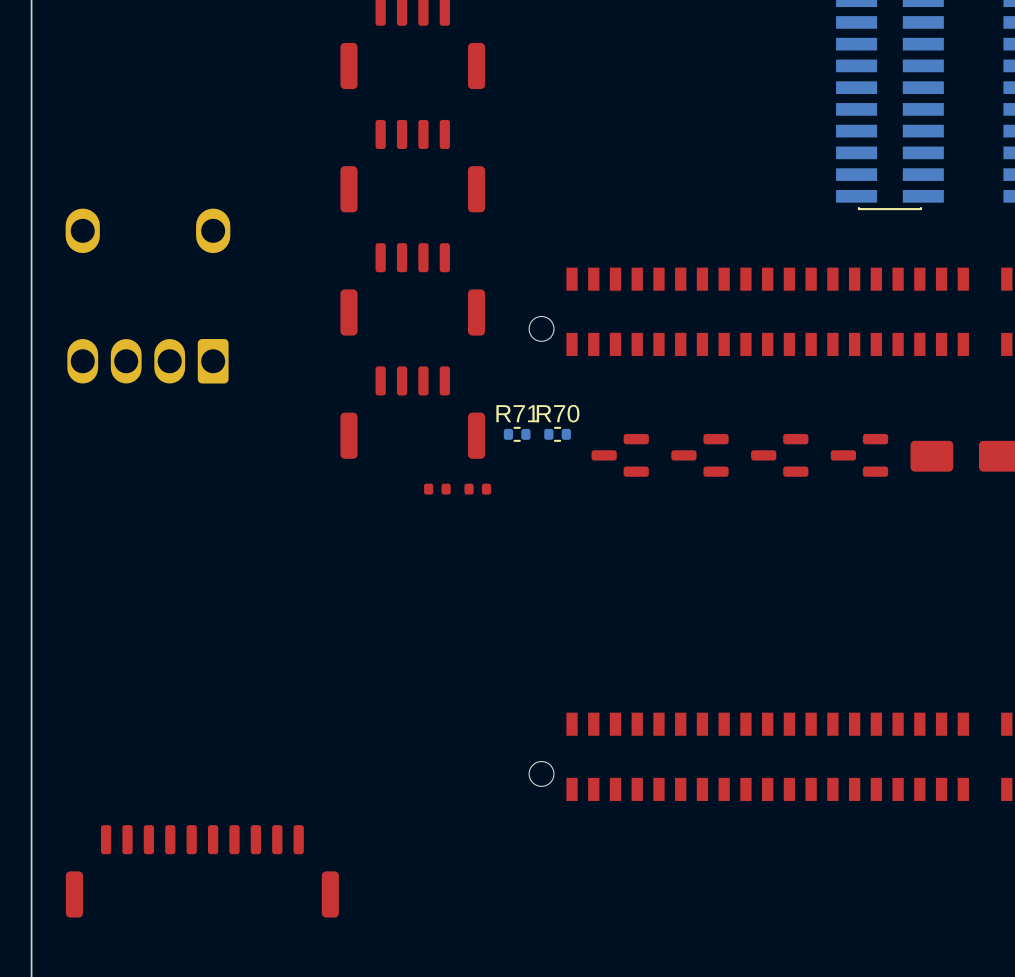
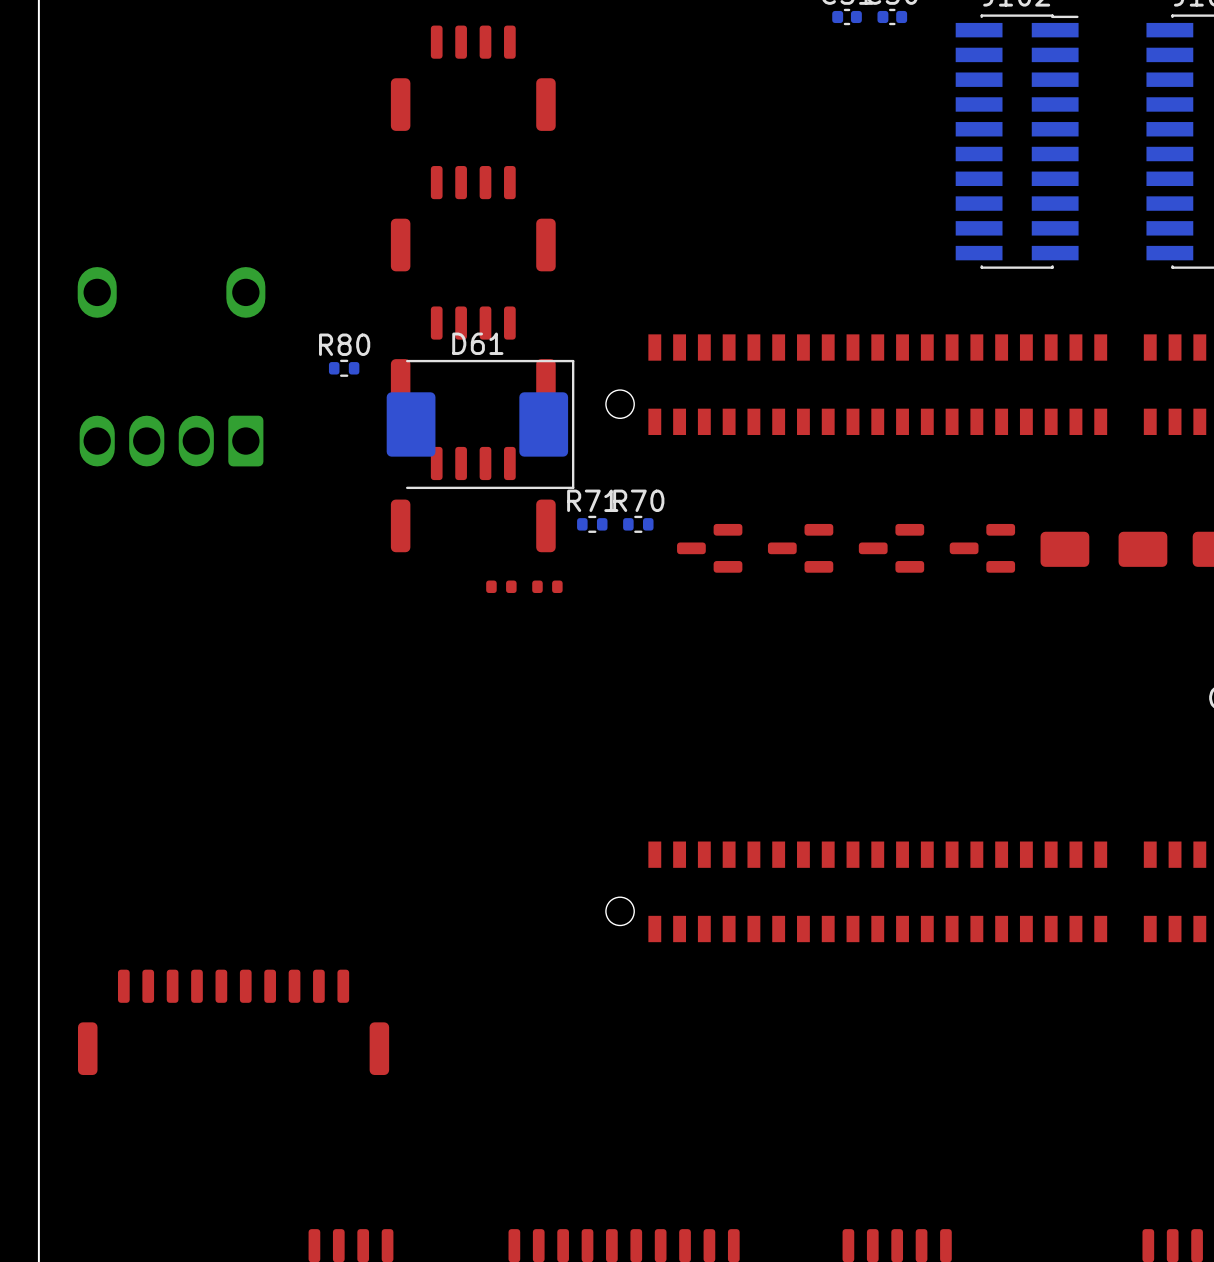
R80: none -> (344, 368)
D61: none -> (480, 424)

